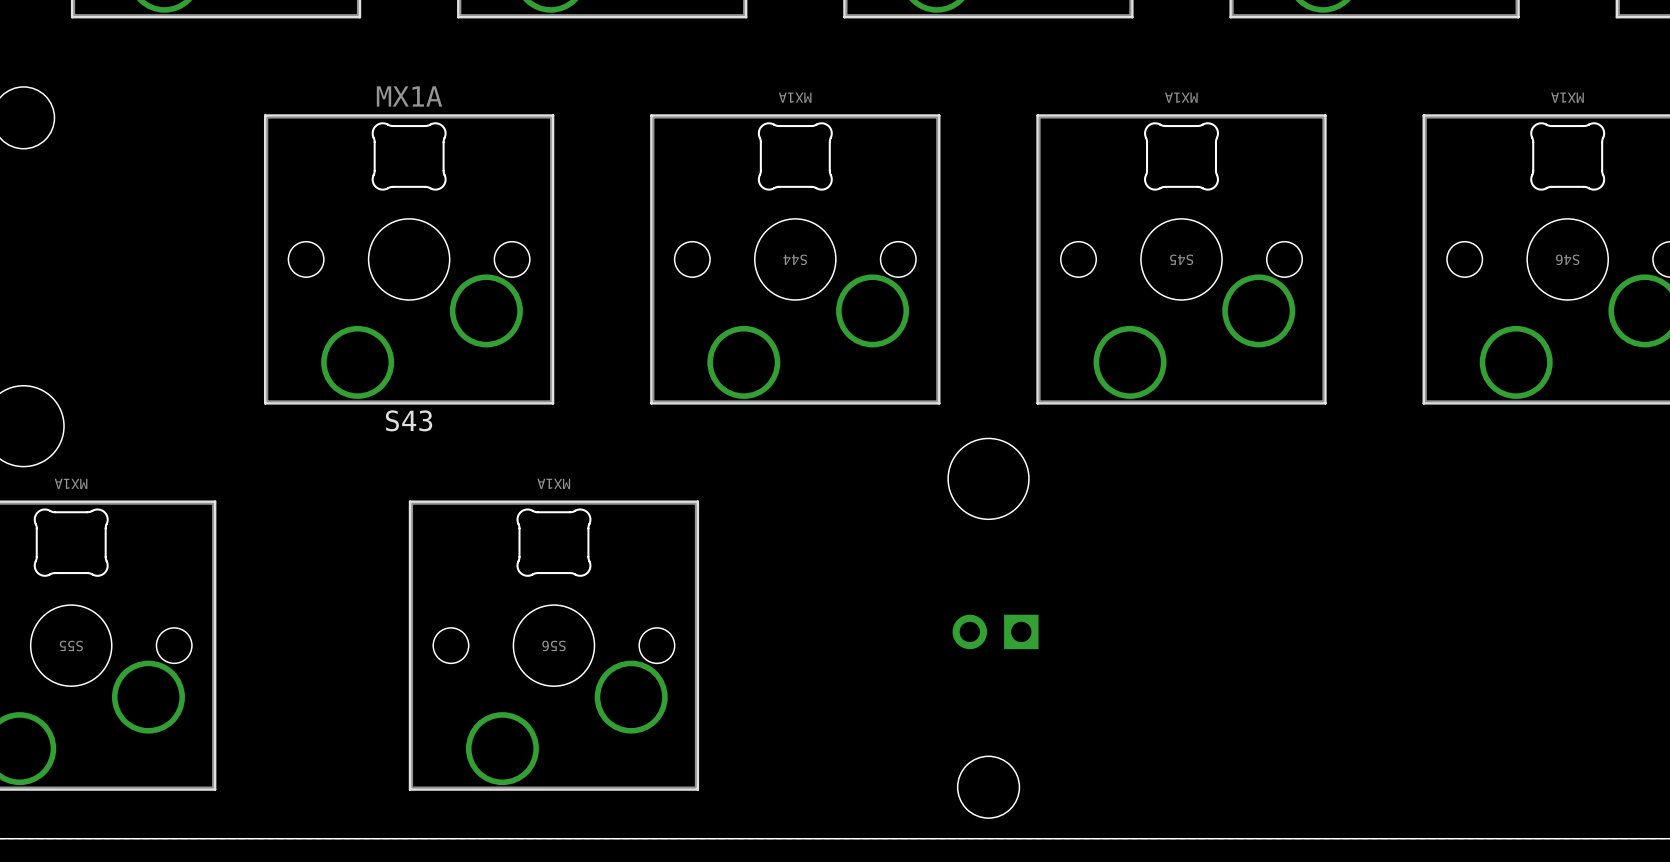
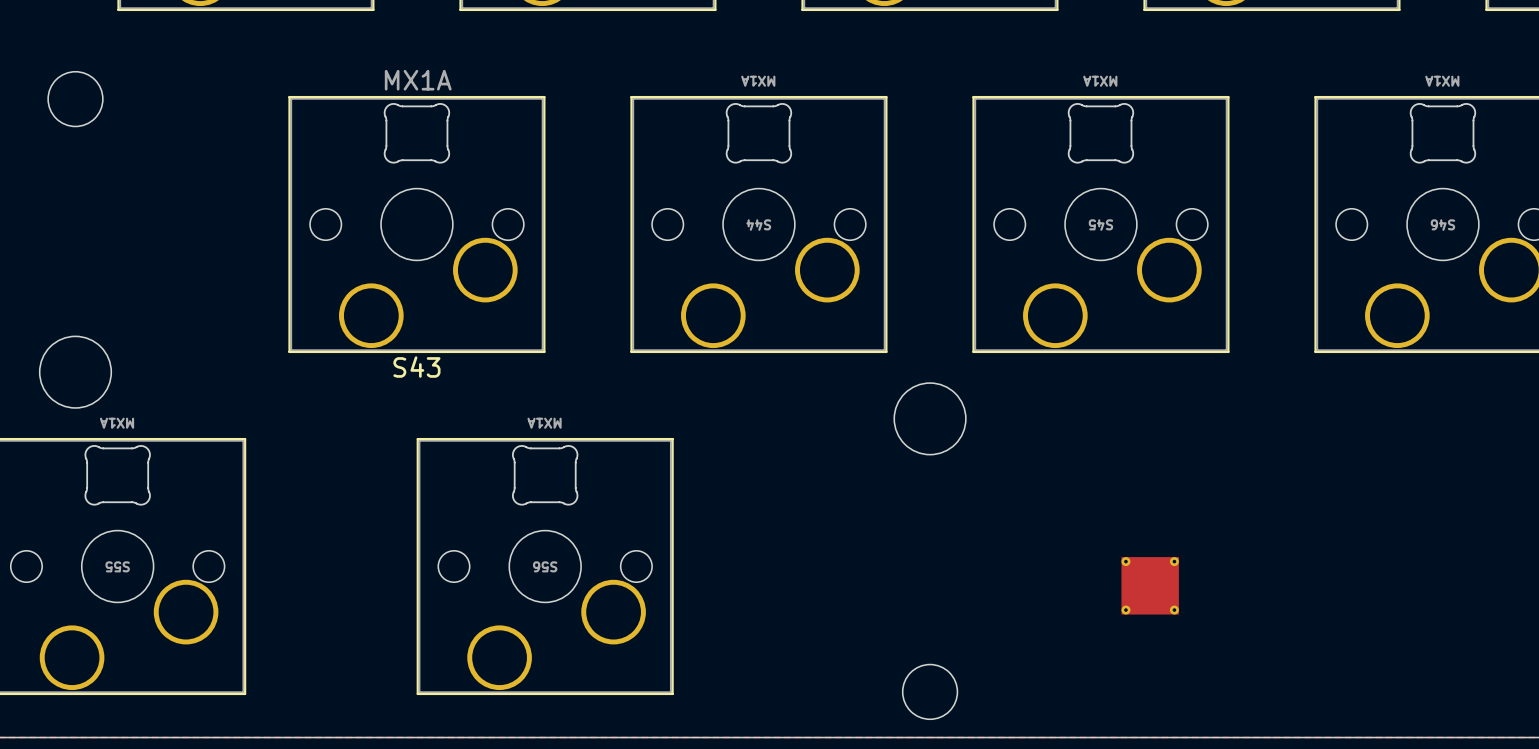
part: (995, 631) -> none
part: none -> (1150, 585)

